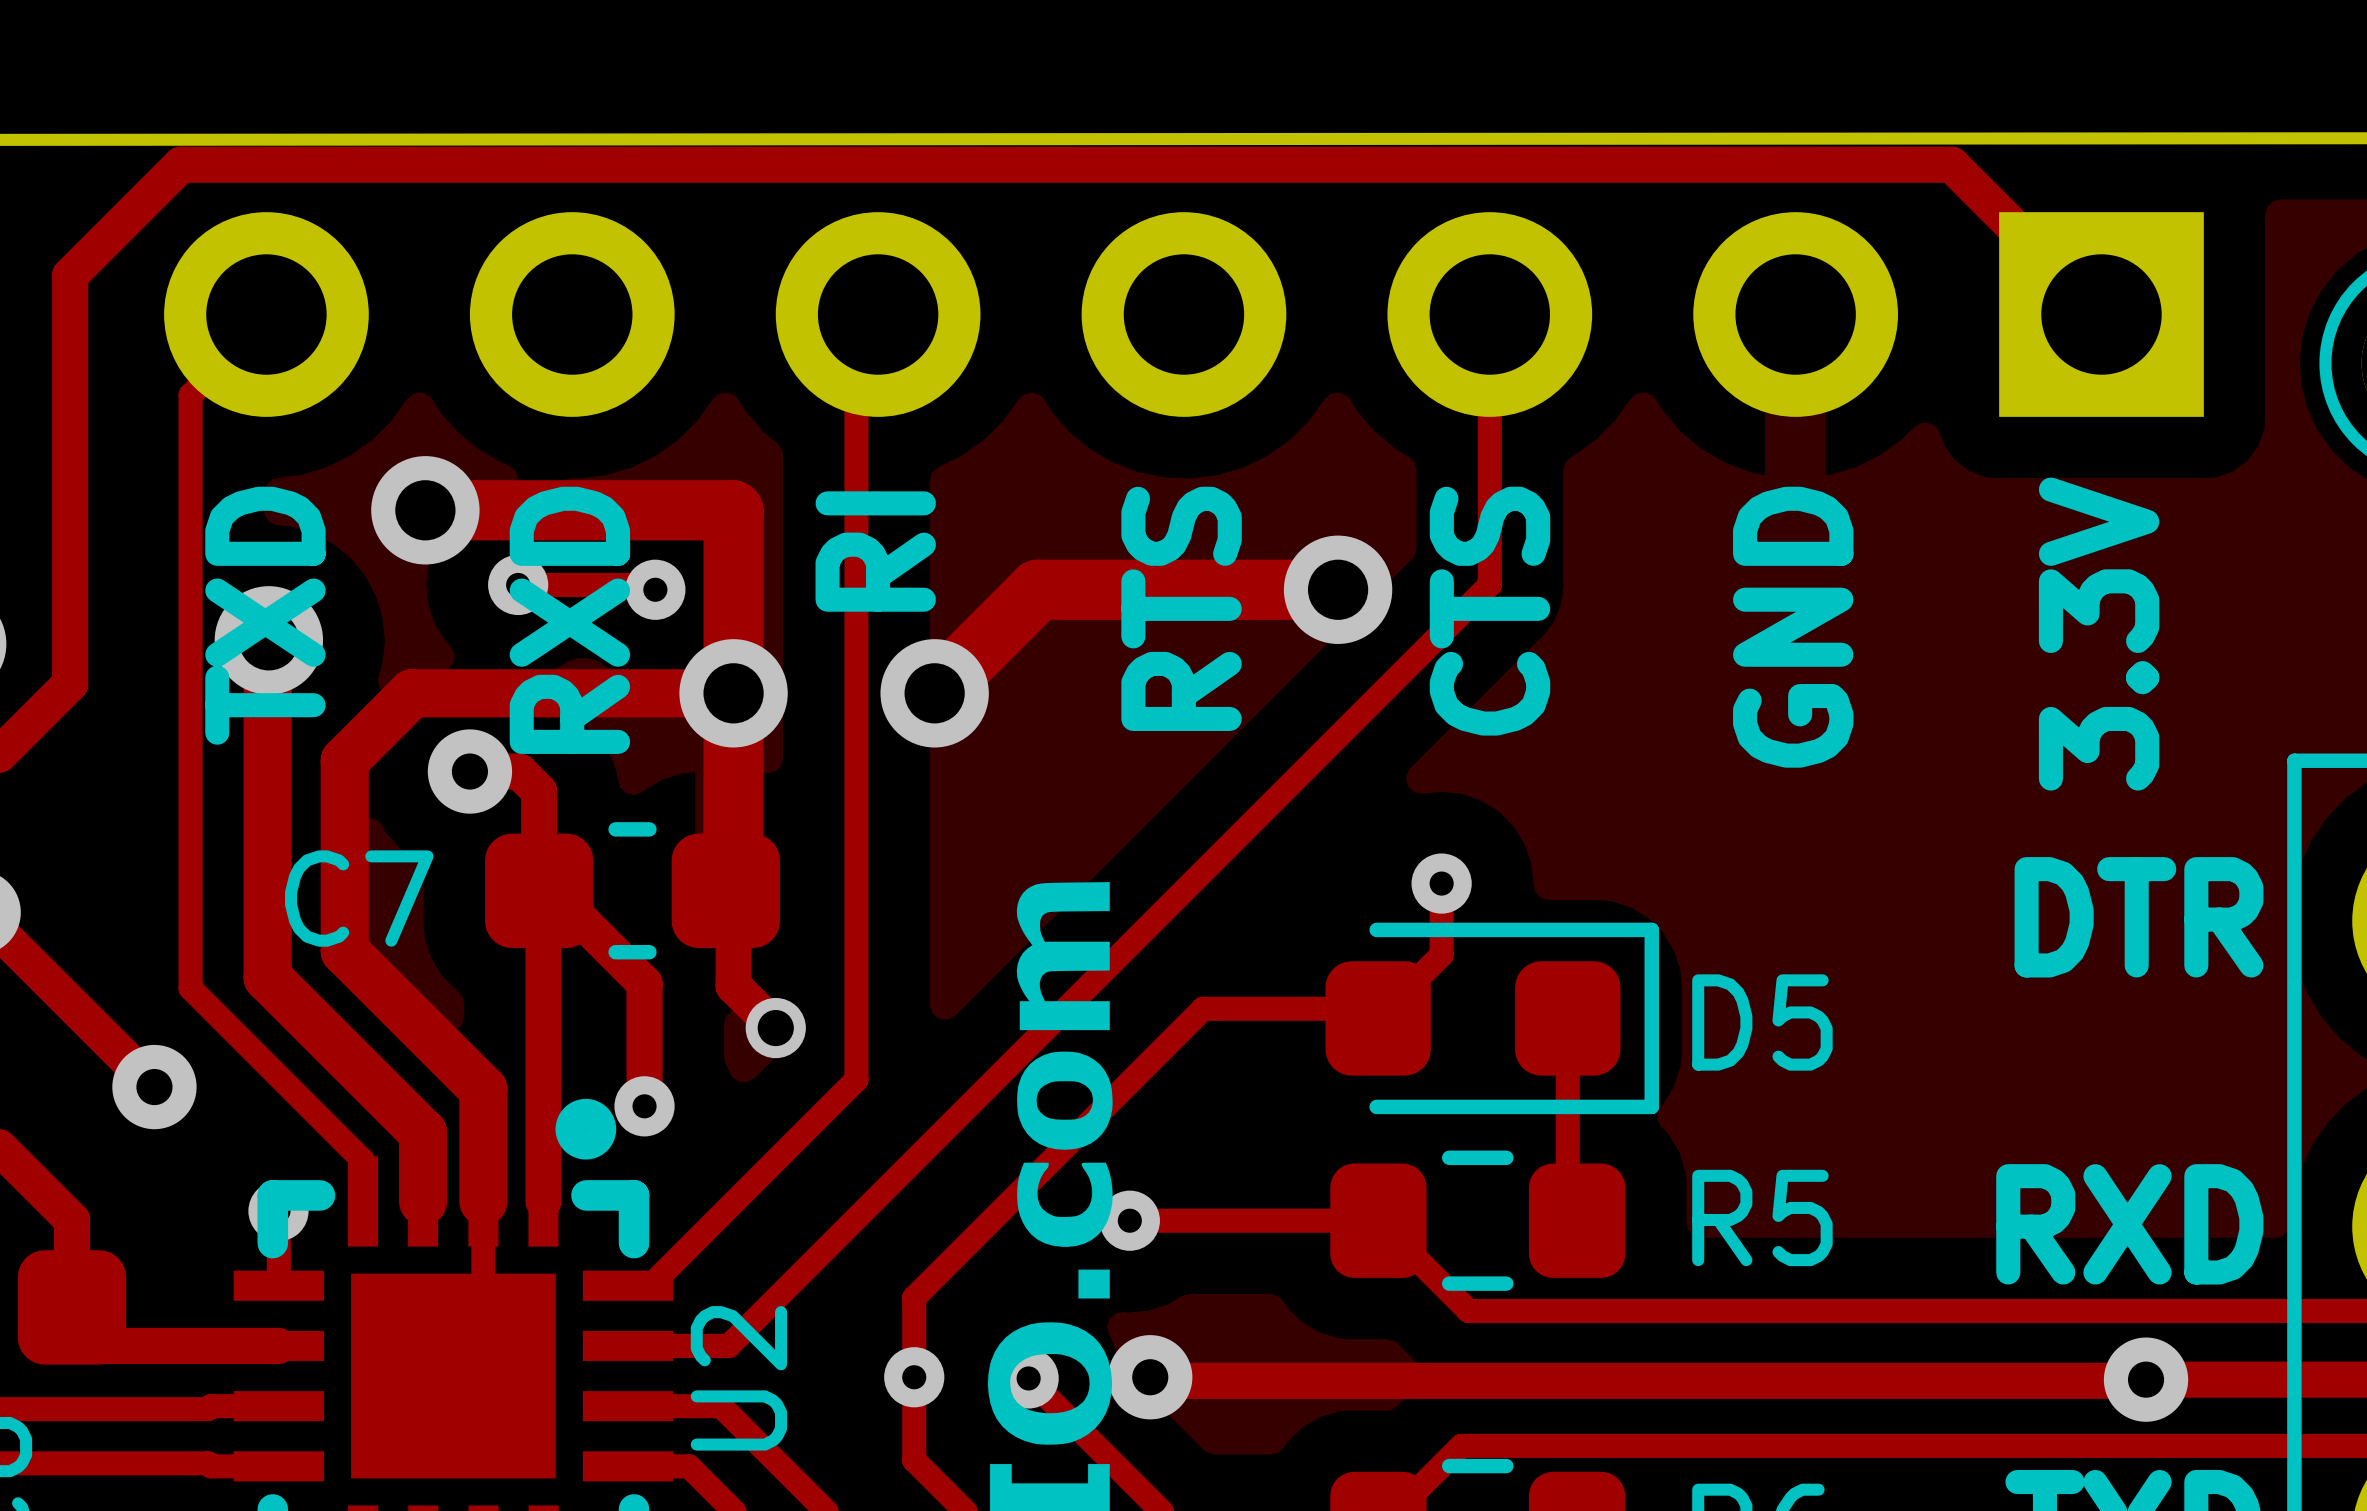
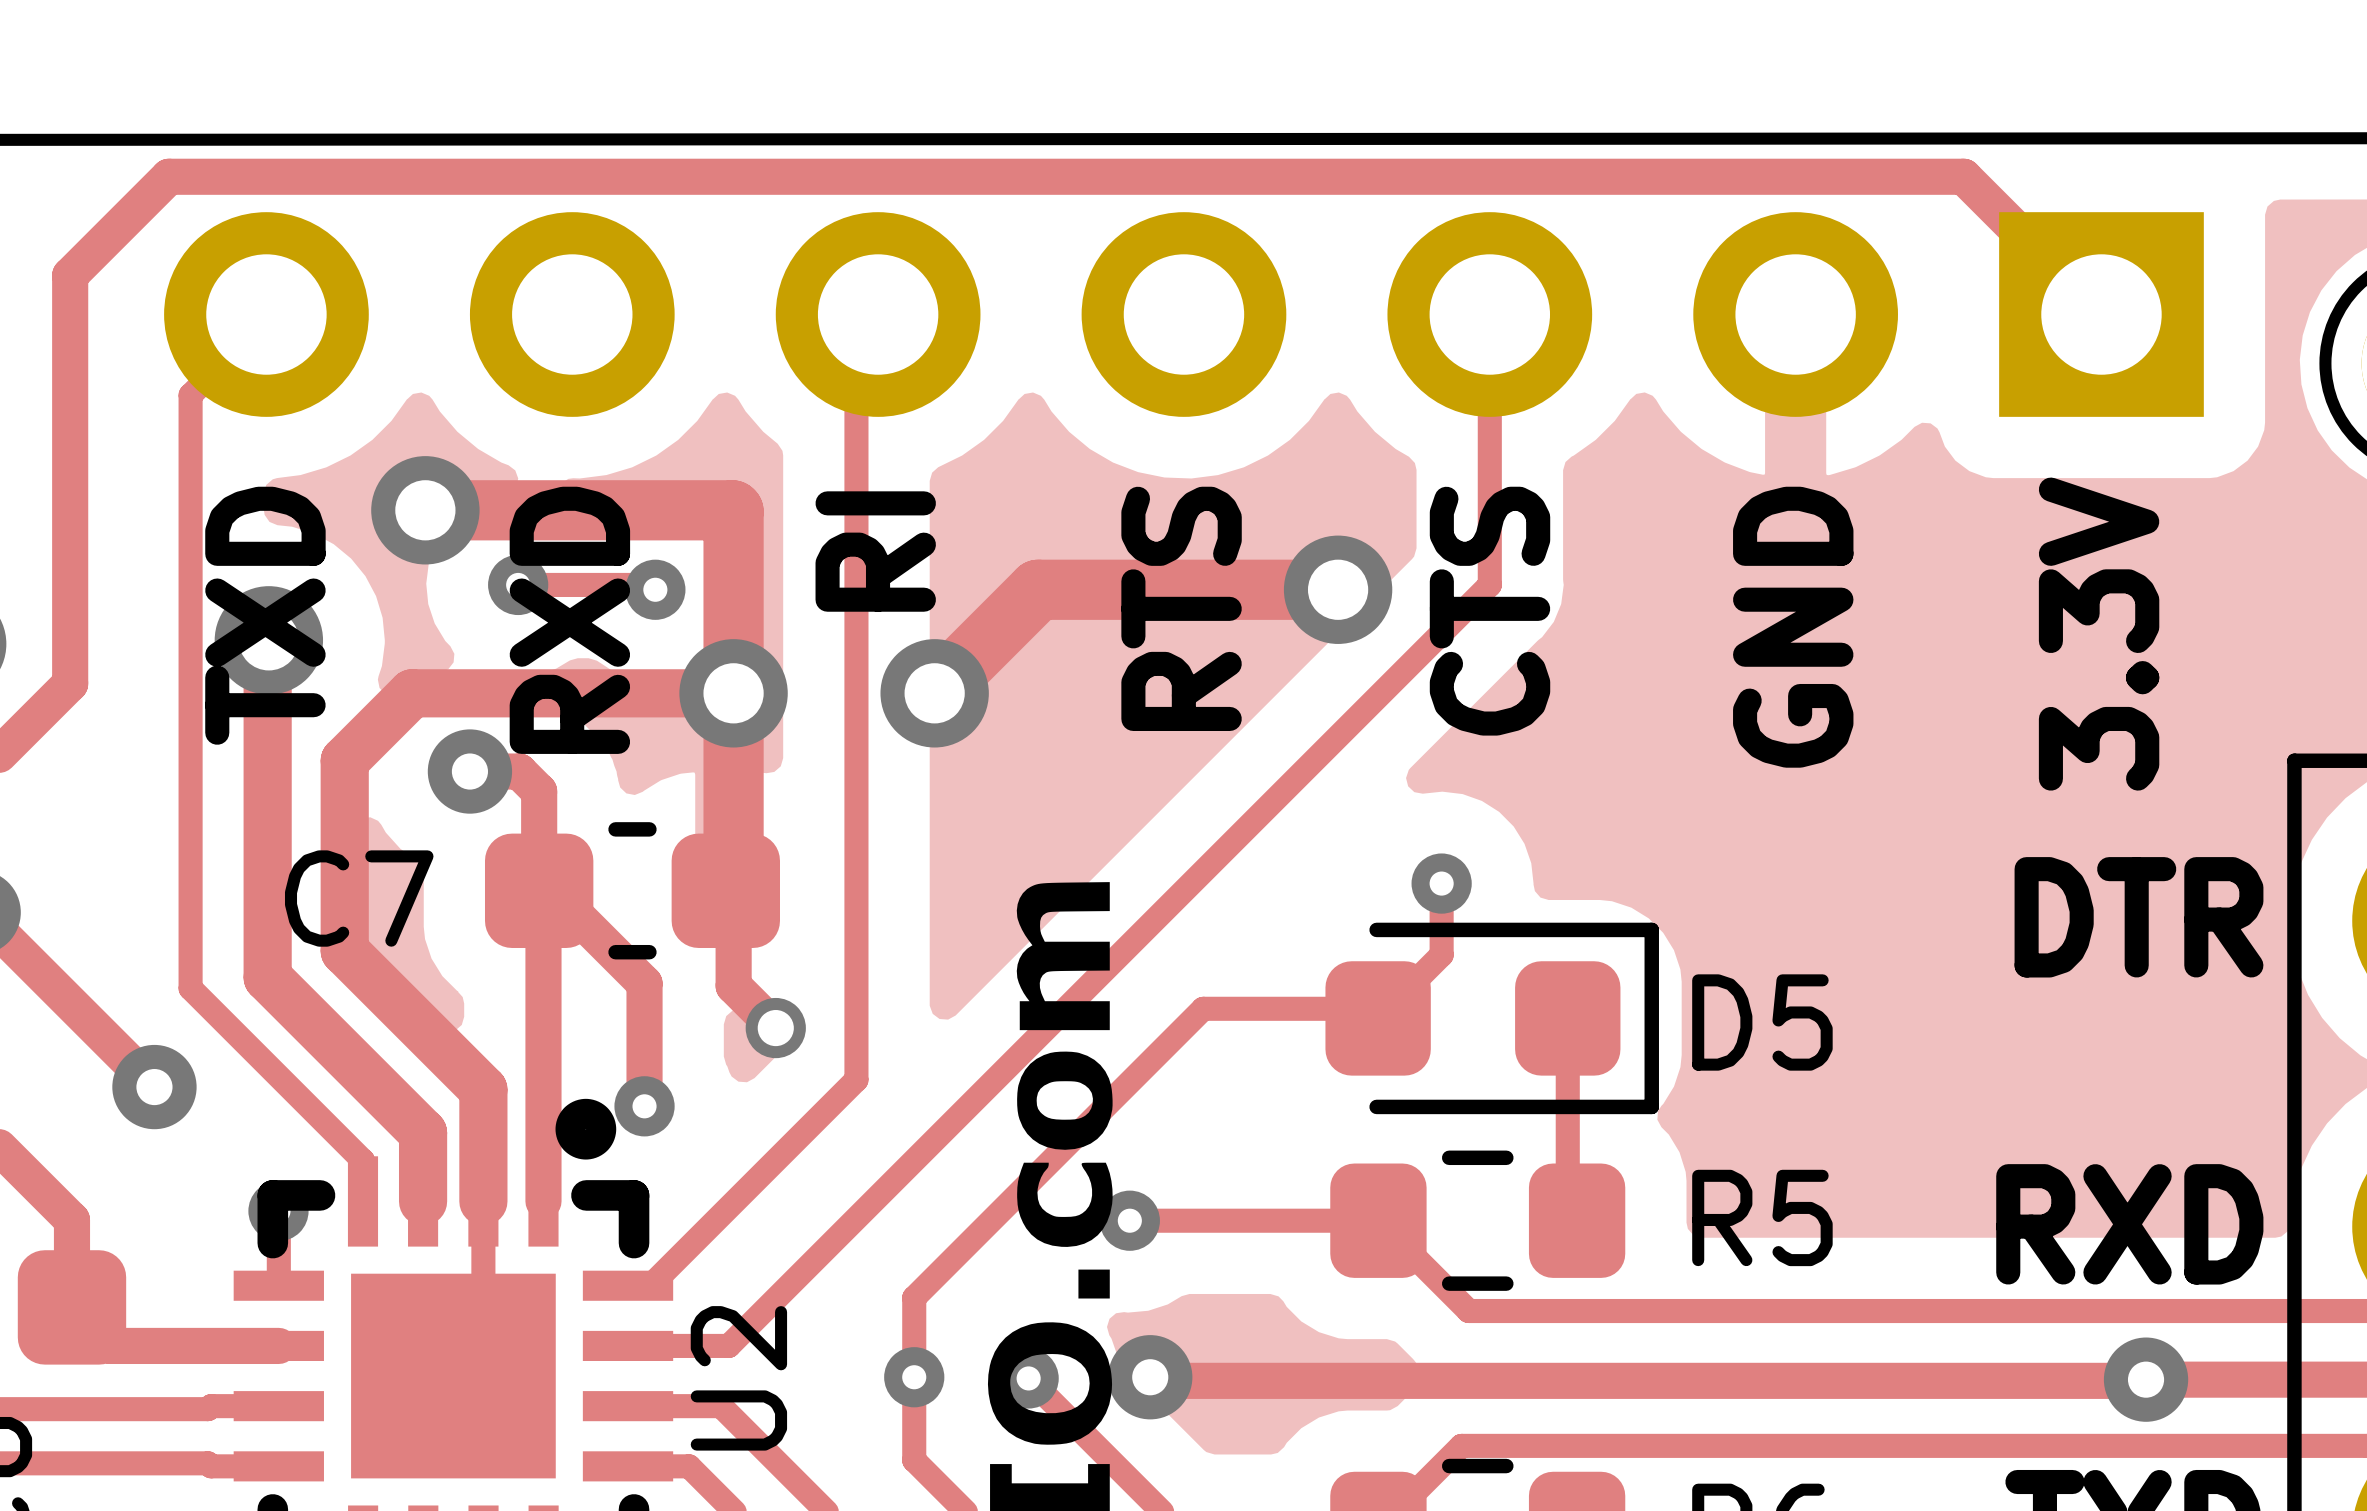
track: (168, 176) (180, 164) (1951, 164) (1963, 176) -> (168, 176) (1963, 176)

